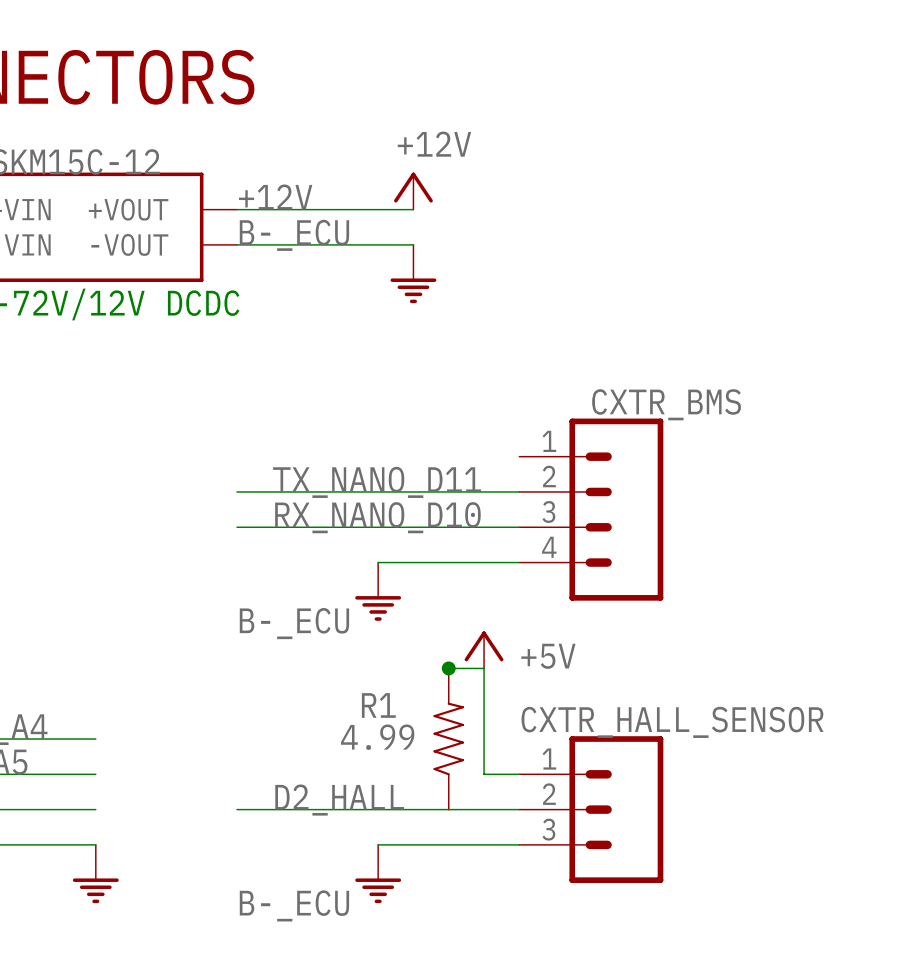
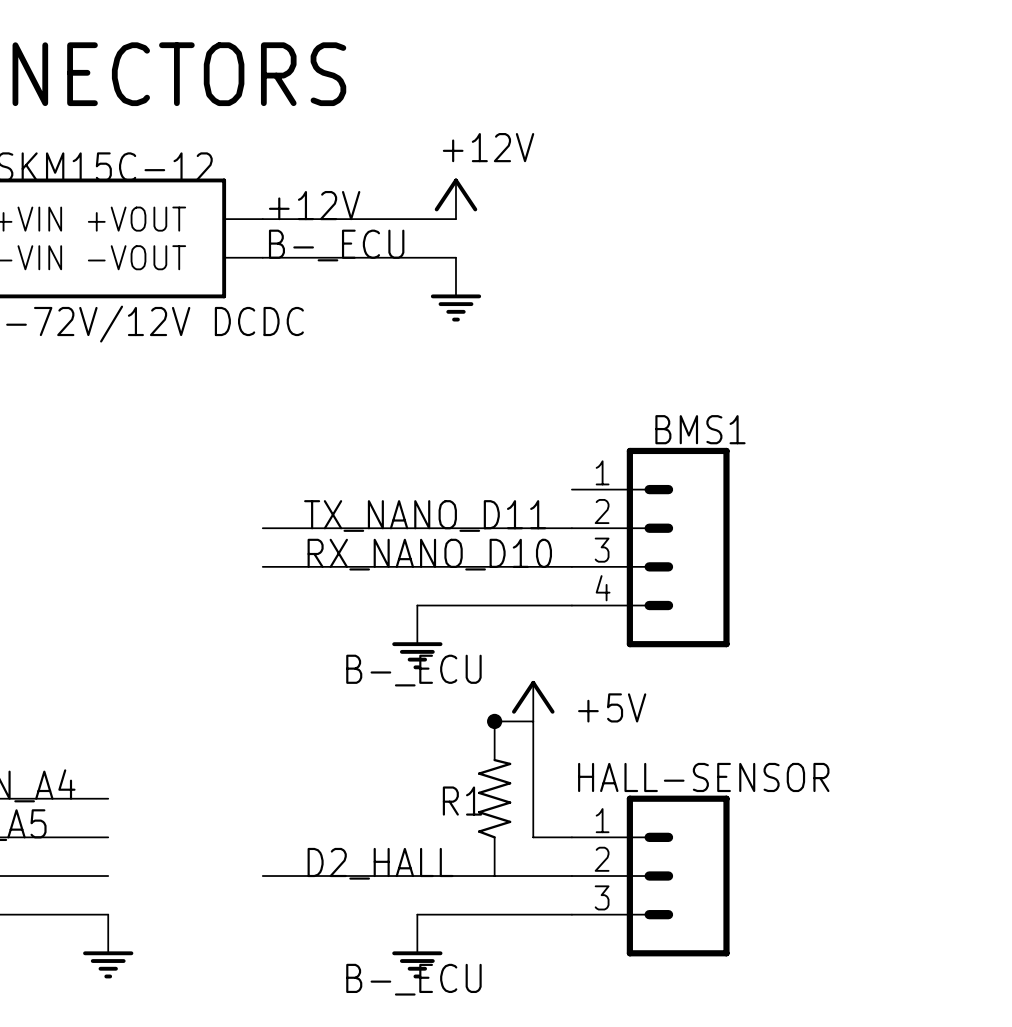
CXTR_BMS name: CXTR_BMS (666, 404) -> BMS1 (700, 429)
label position: B-_ECU (294, 623) -> B-_ECU (413, 670)
R1 name position: R1 (378, 705) -> R1 (462, 801)
CXTR_HALL_SENSOR name: CXTR_HALL_SENSOR (672, 722) -> HALL-SENSOR (703, 777)
R1 value: 4.99 (377, 737) -> none
label position: B-_ECU (294, 905) -> B-_ECU (413, 979)

